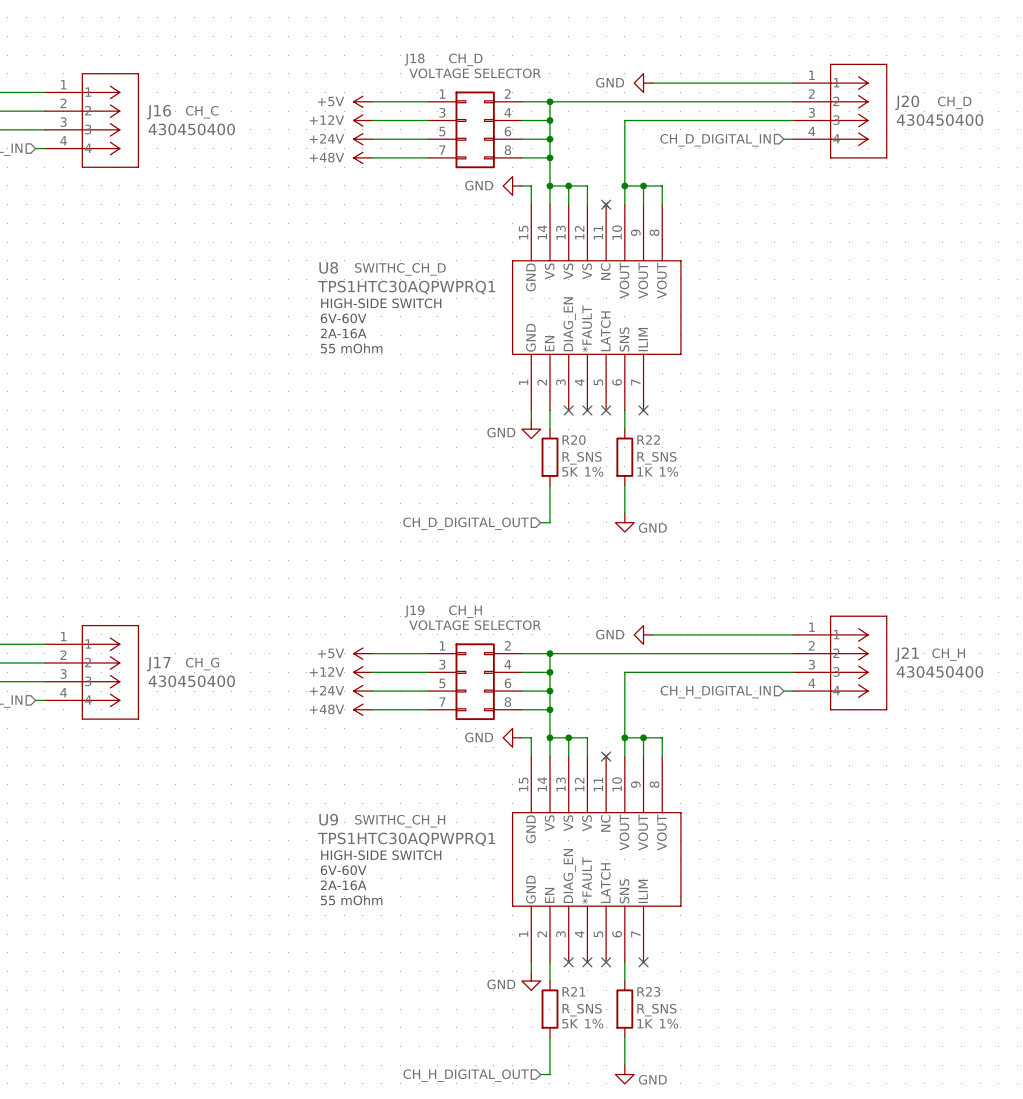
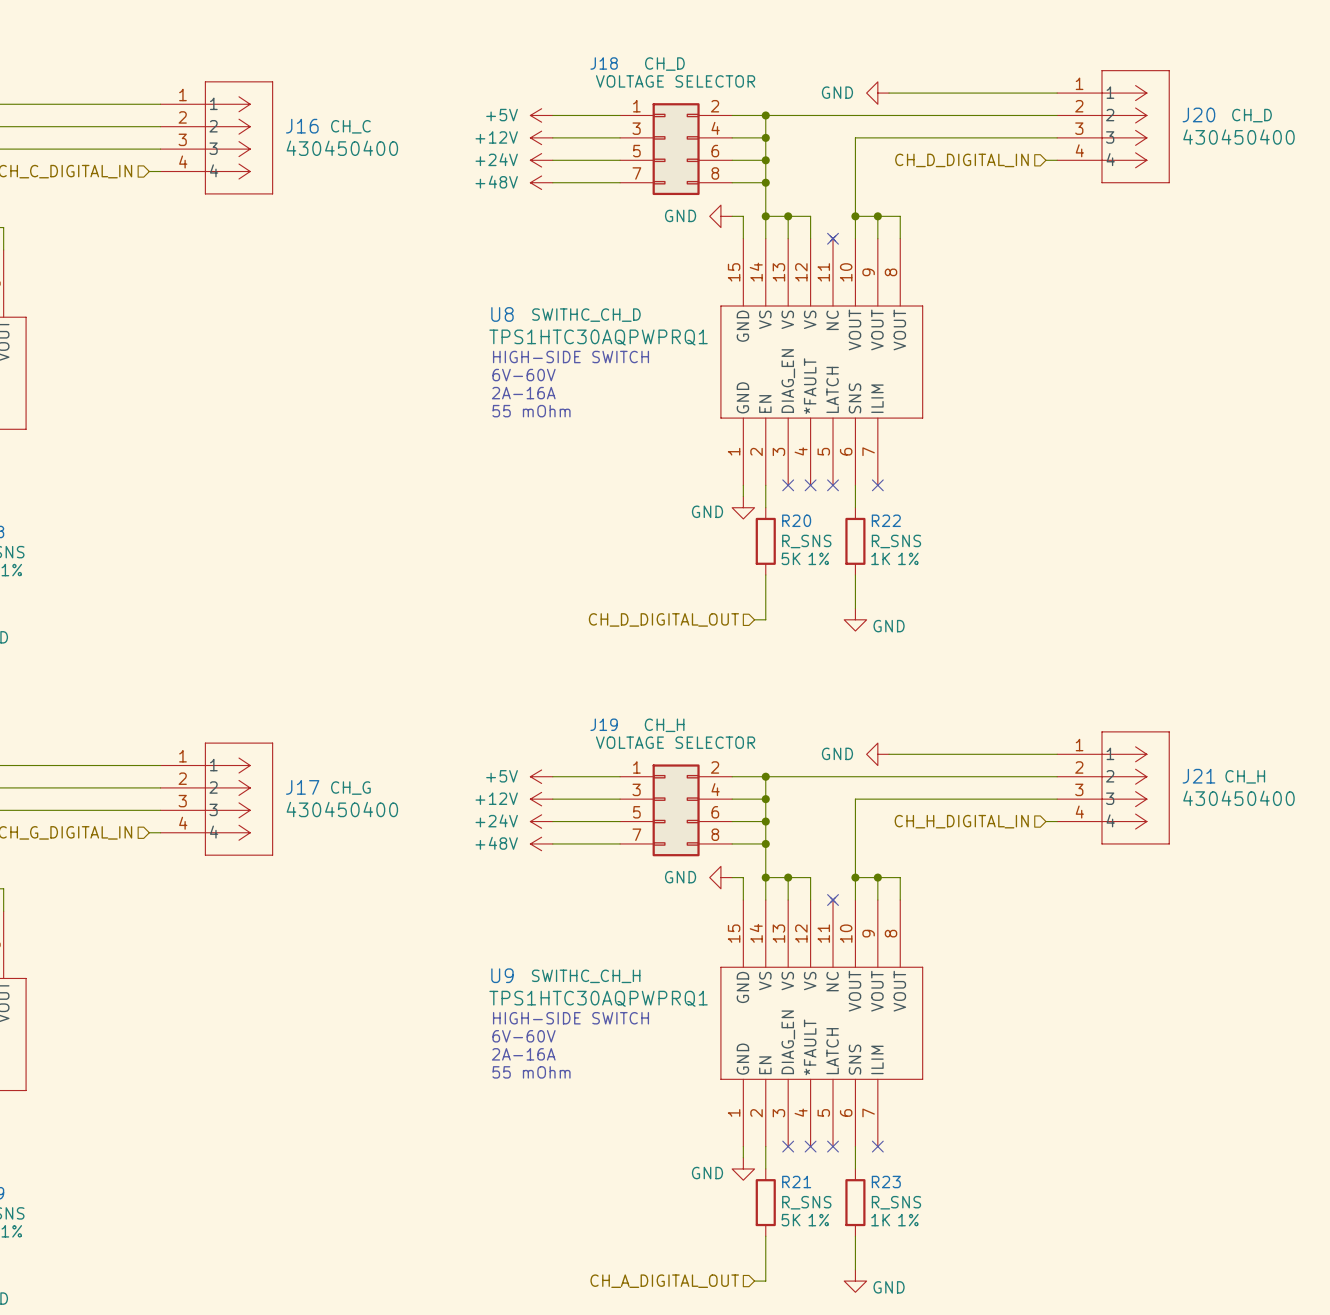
hierarchical label: CH_H_DIGITAL_OUT (466, 1075) -> CH_A_DIGITAL_OUT (664, 1281)

